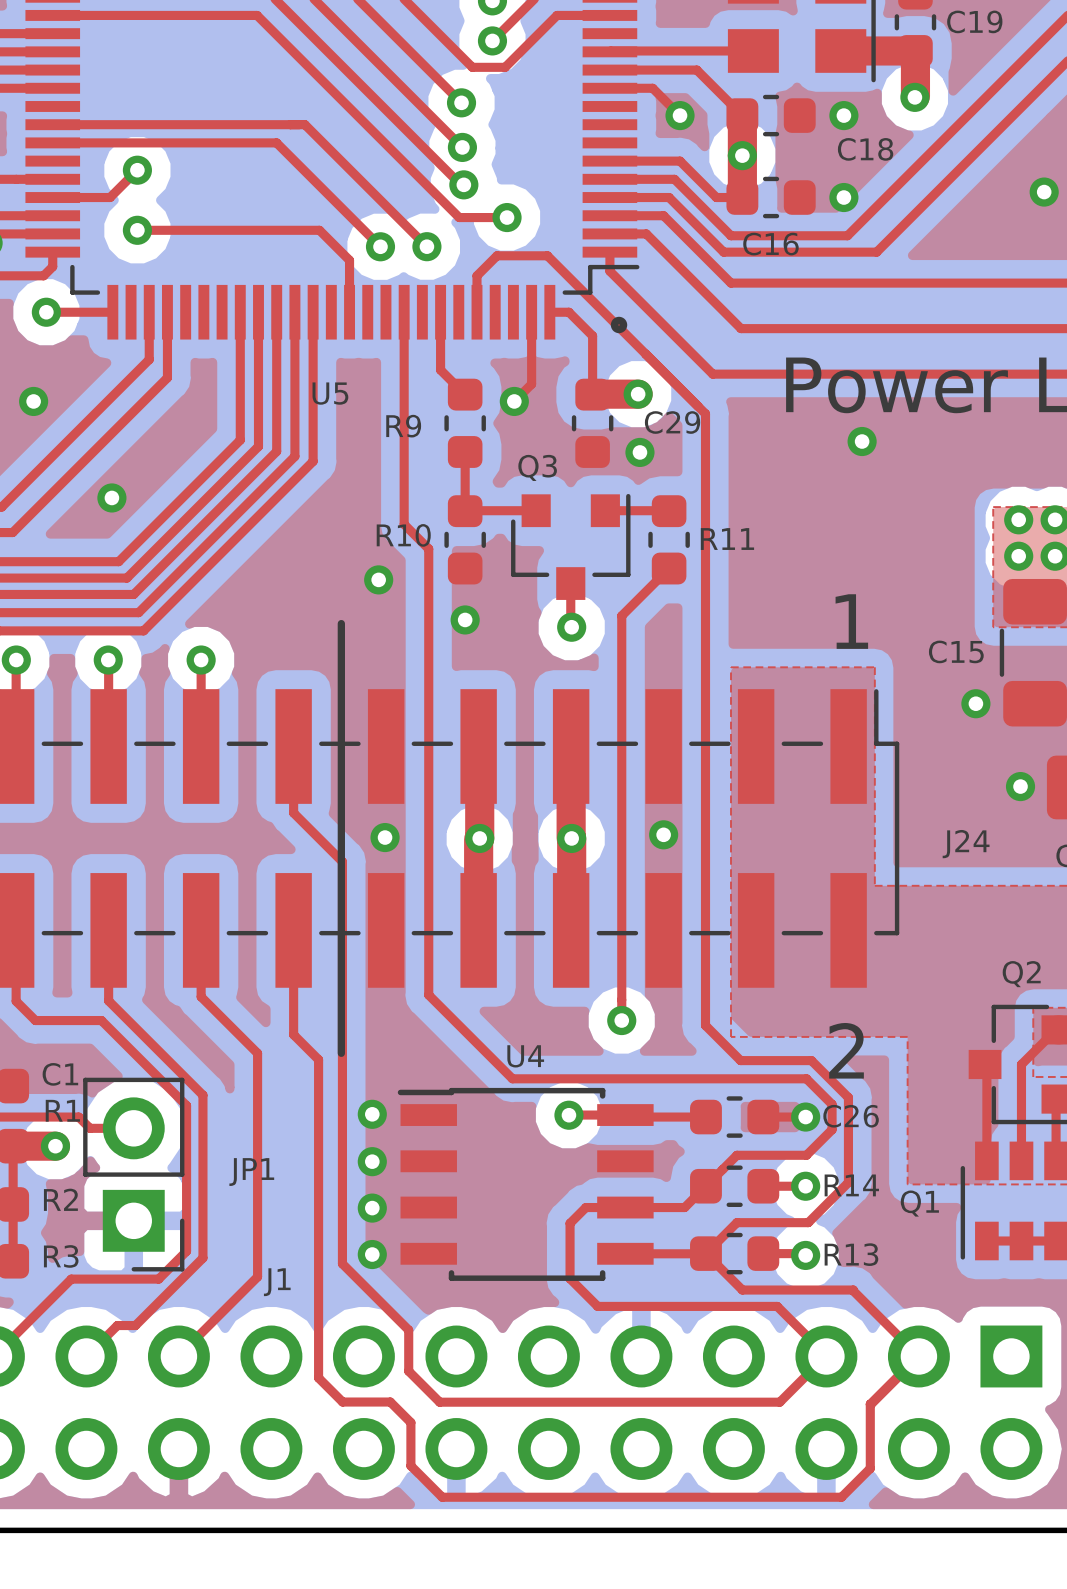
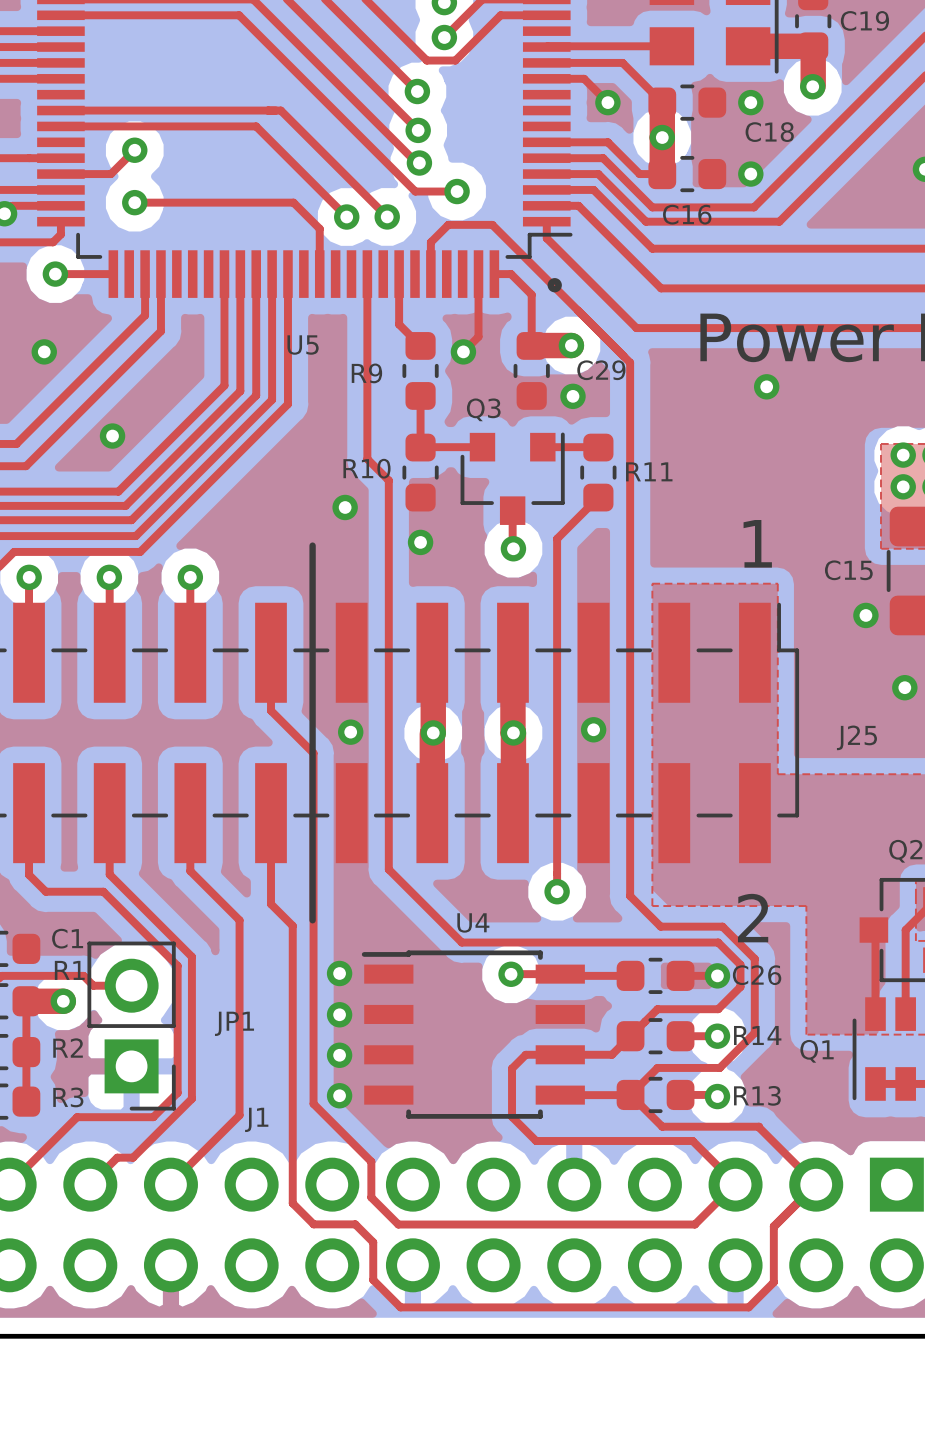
J24 name: J24 (966, 844) -> J25 (856, 737)

